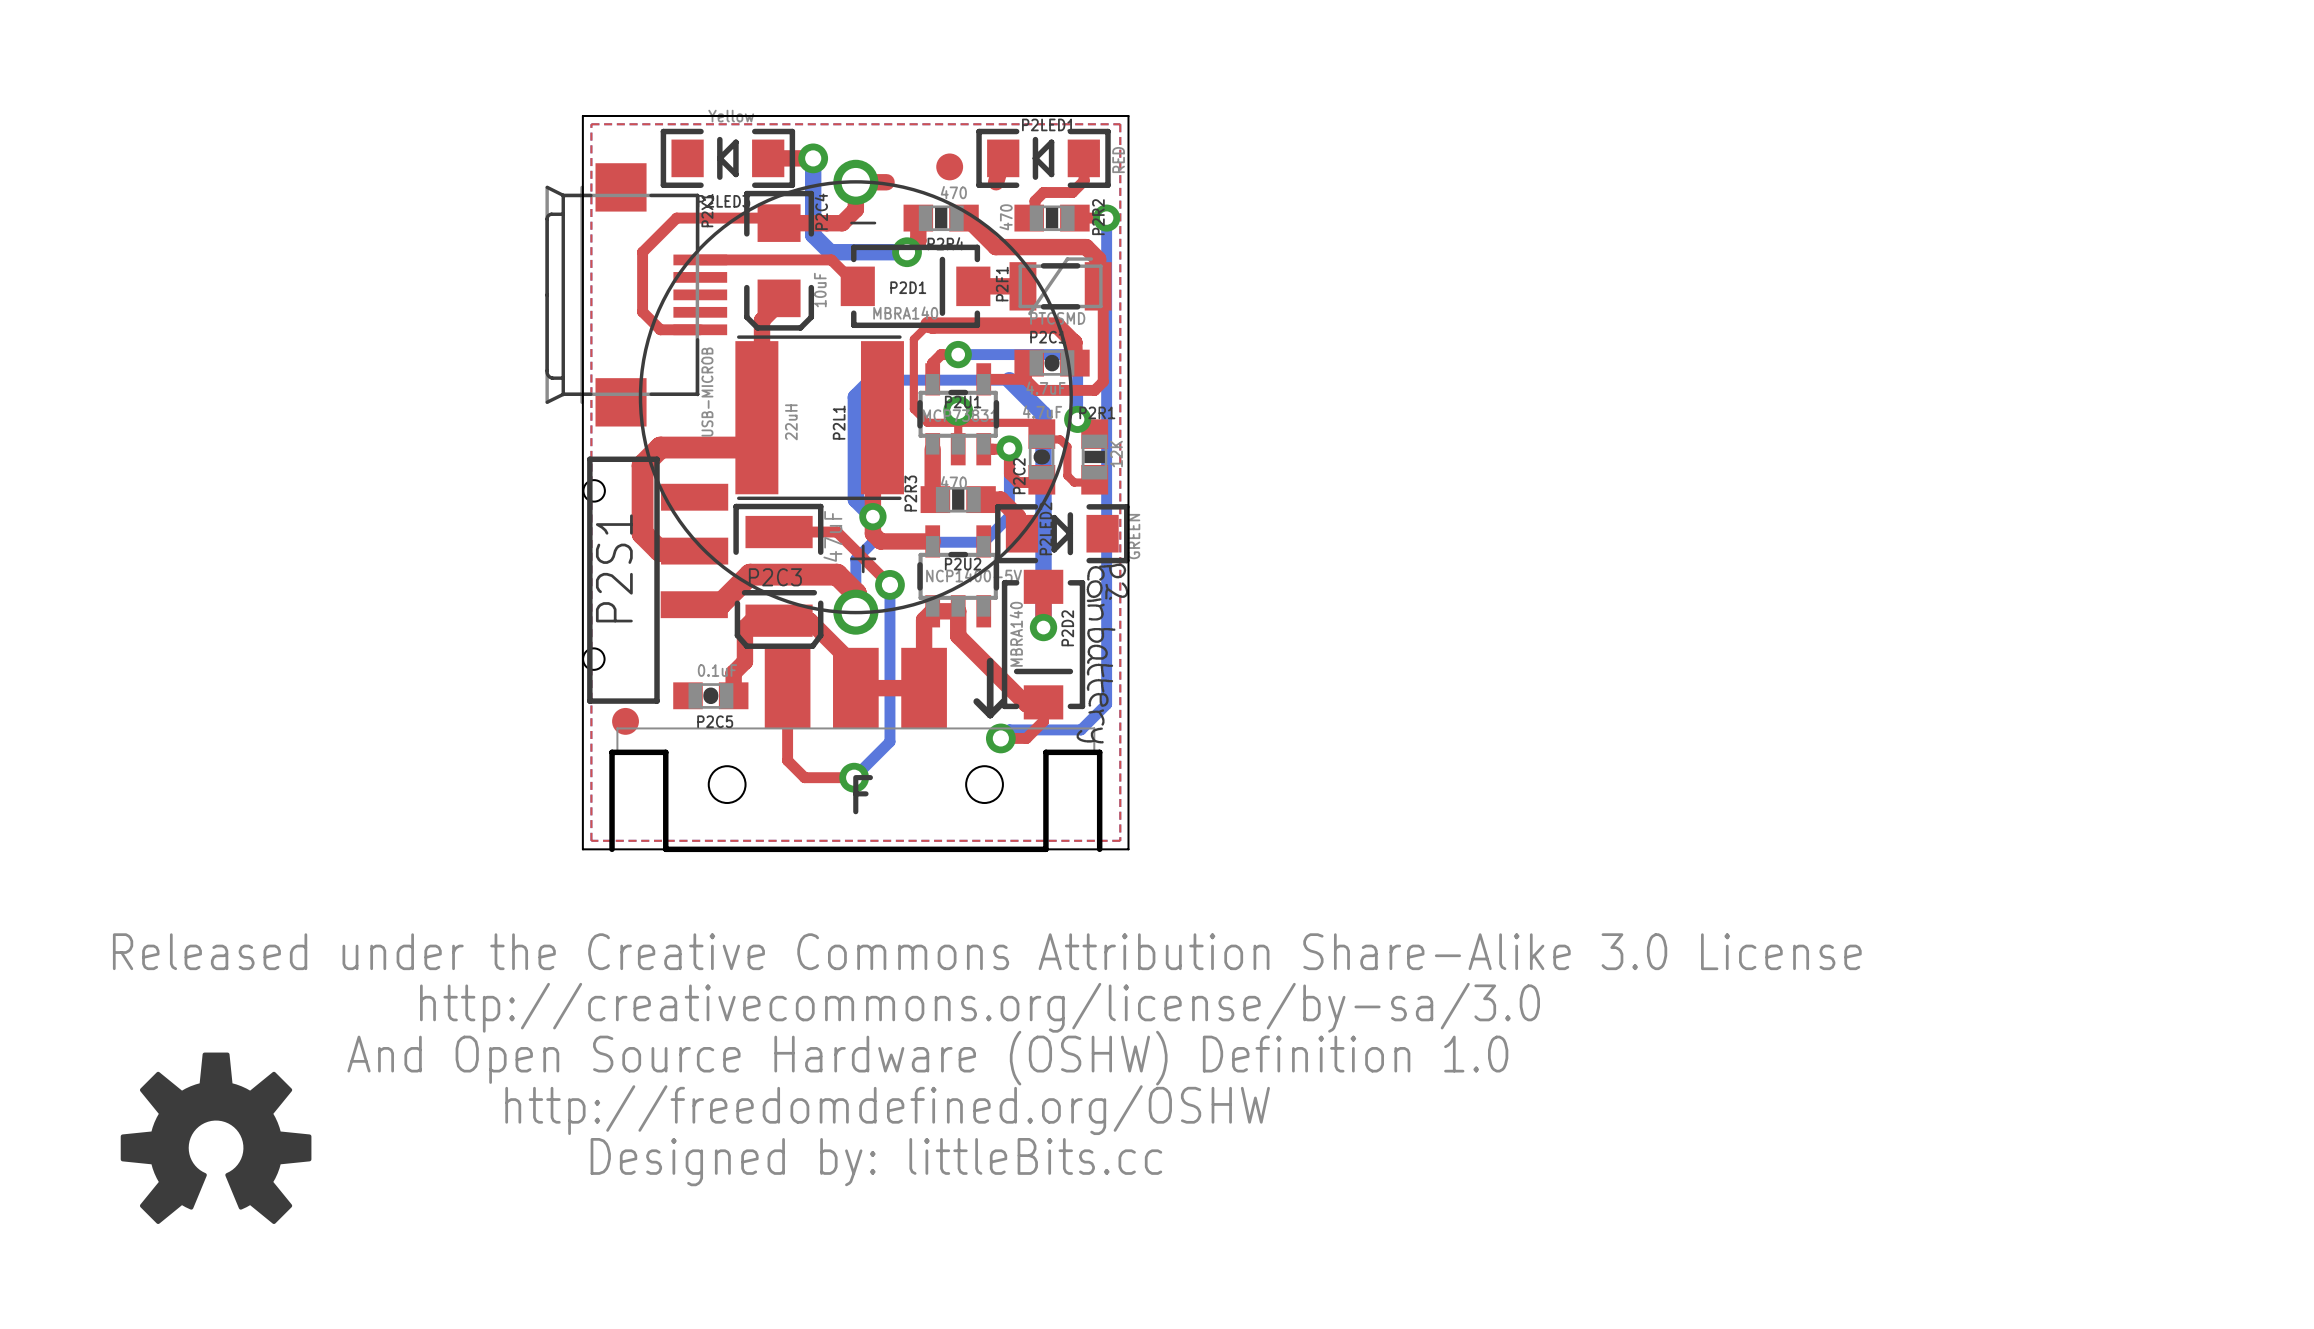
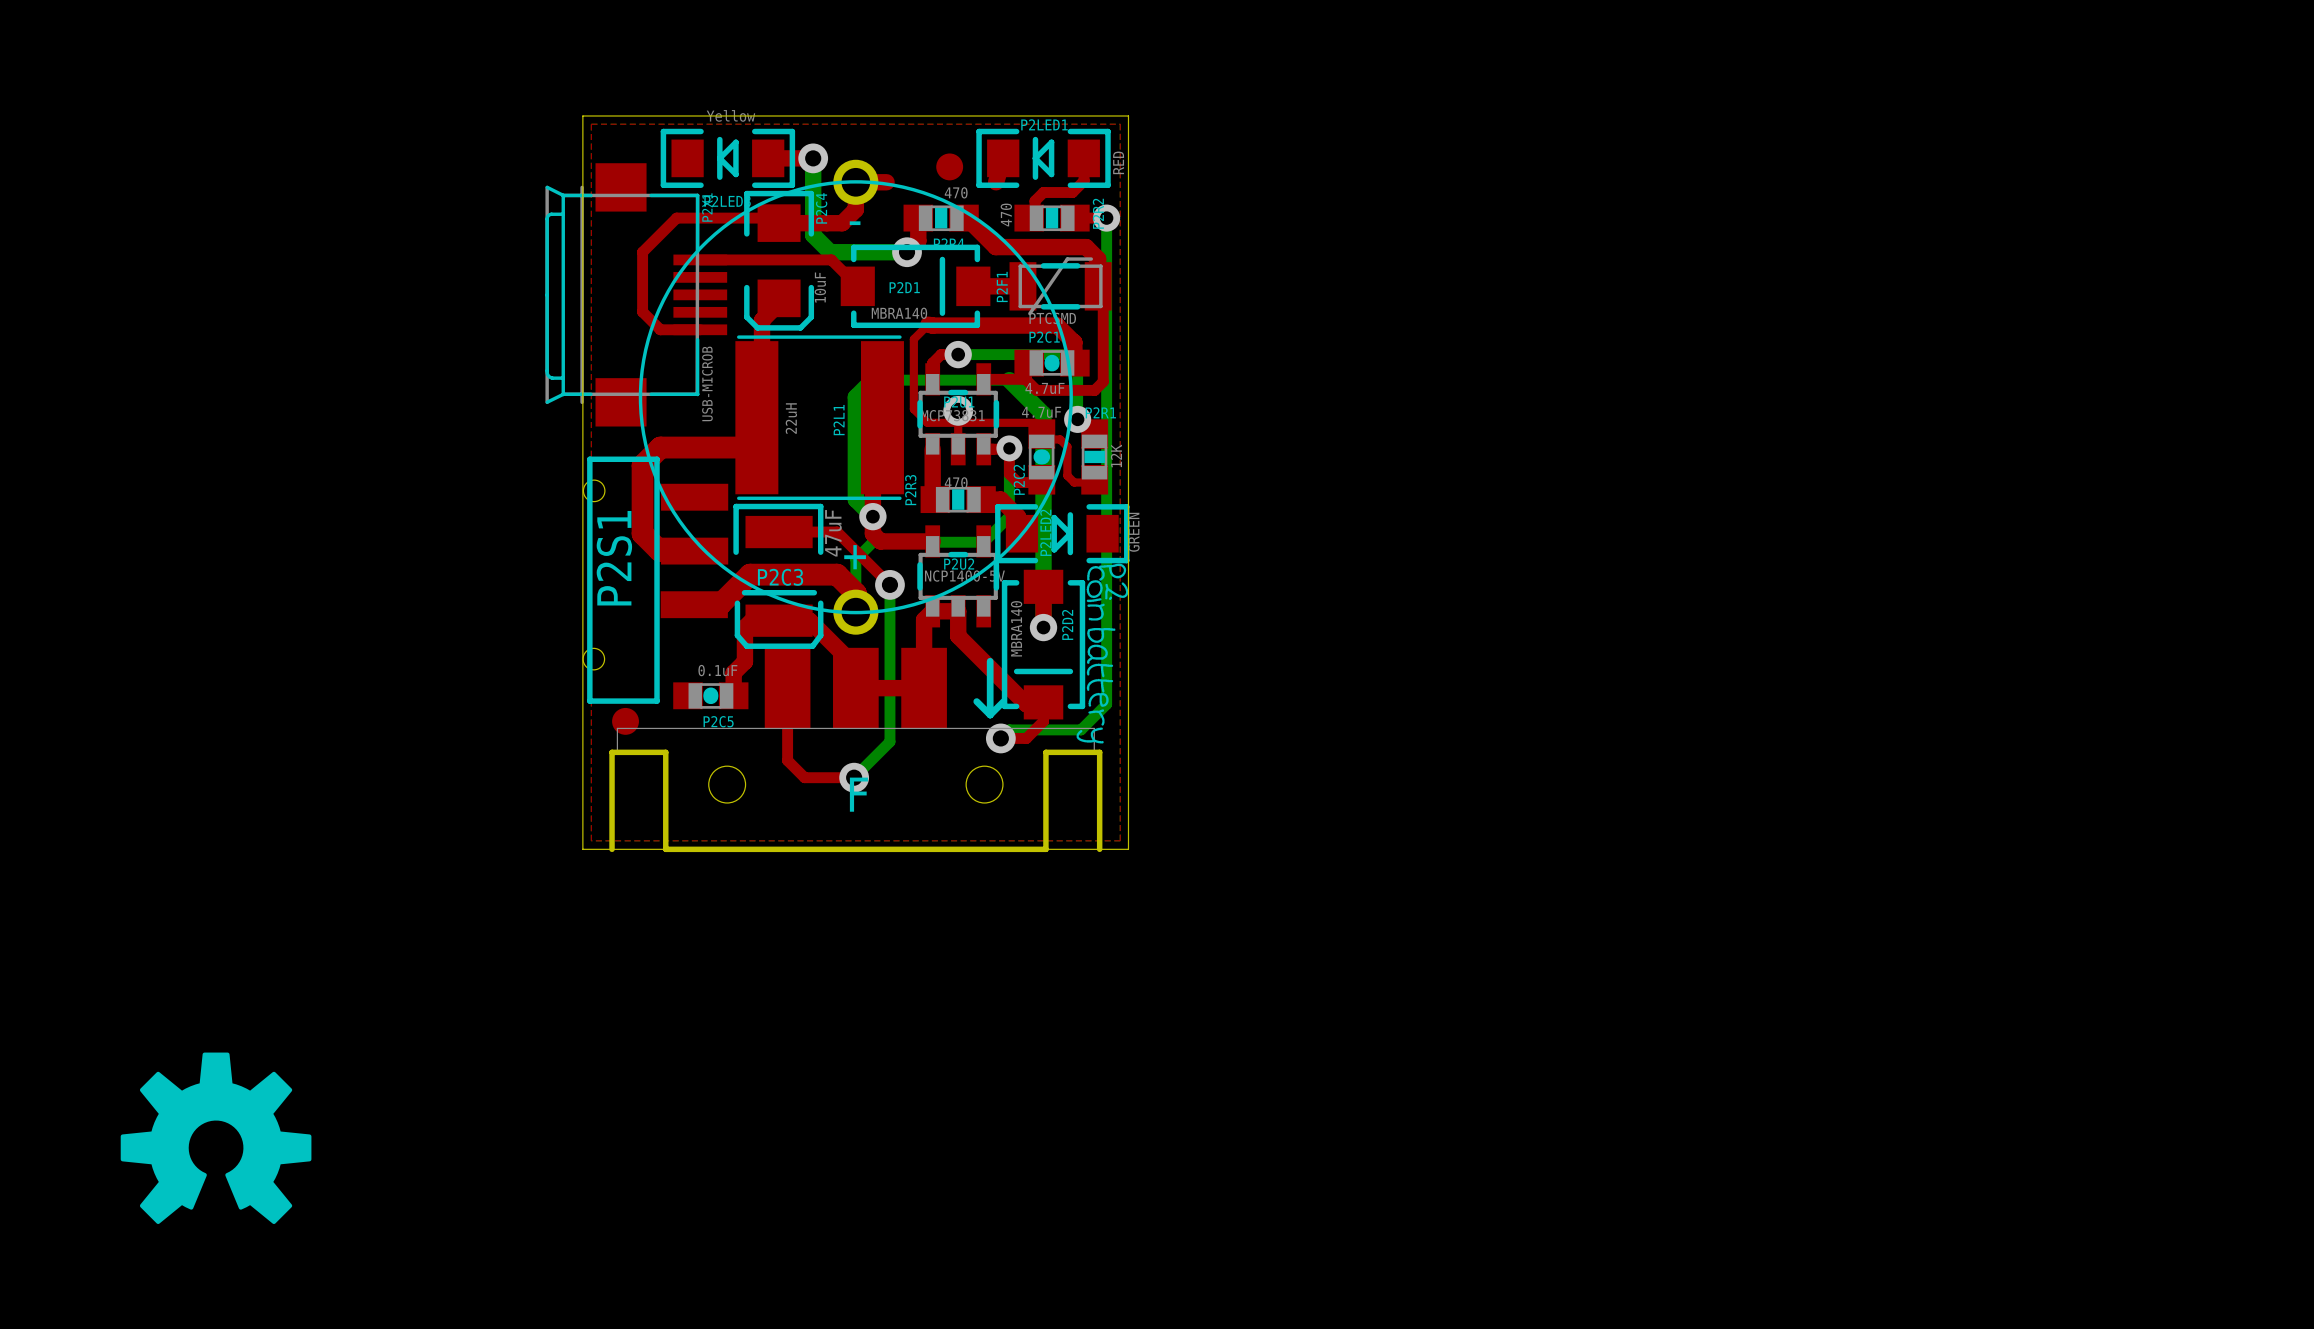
drawing: [112, 933, 1862, 1187] -> none

